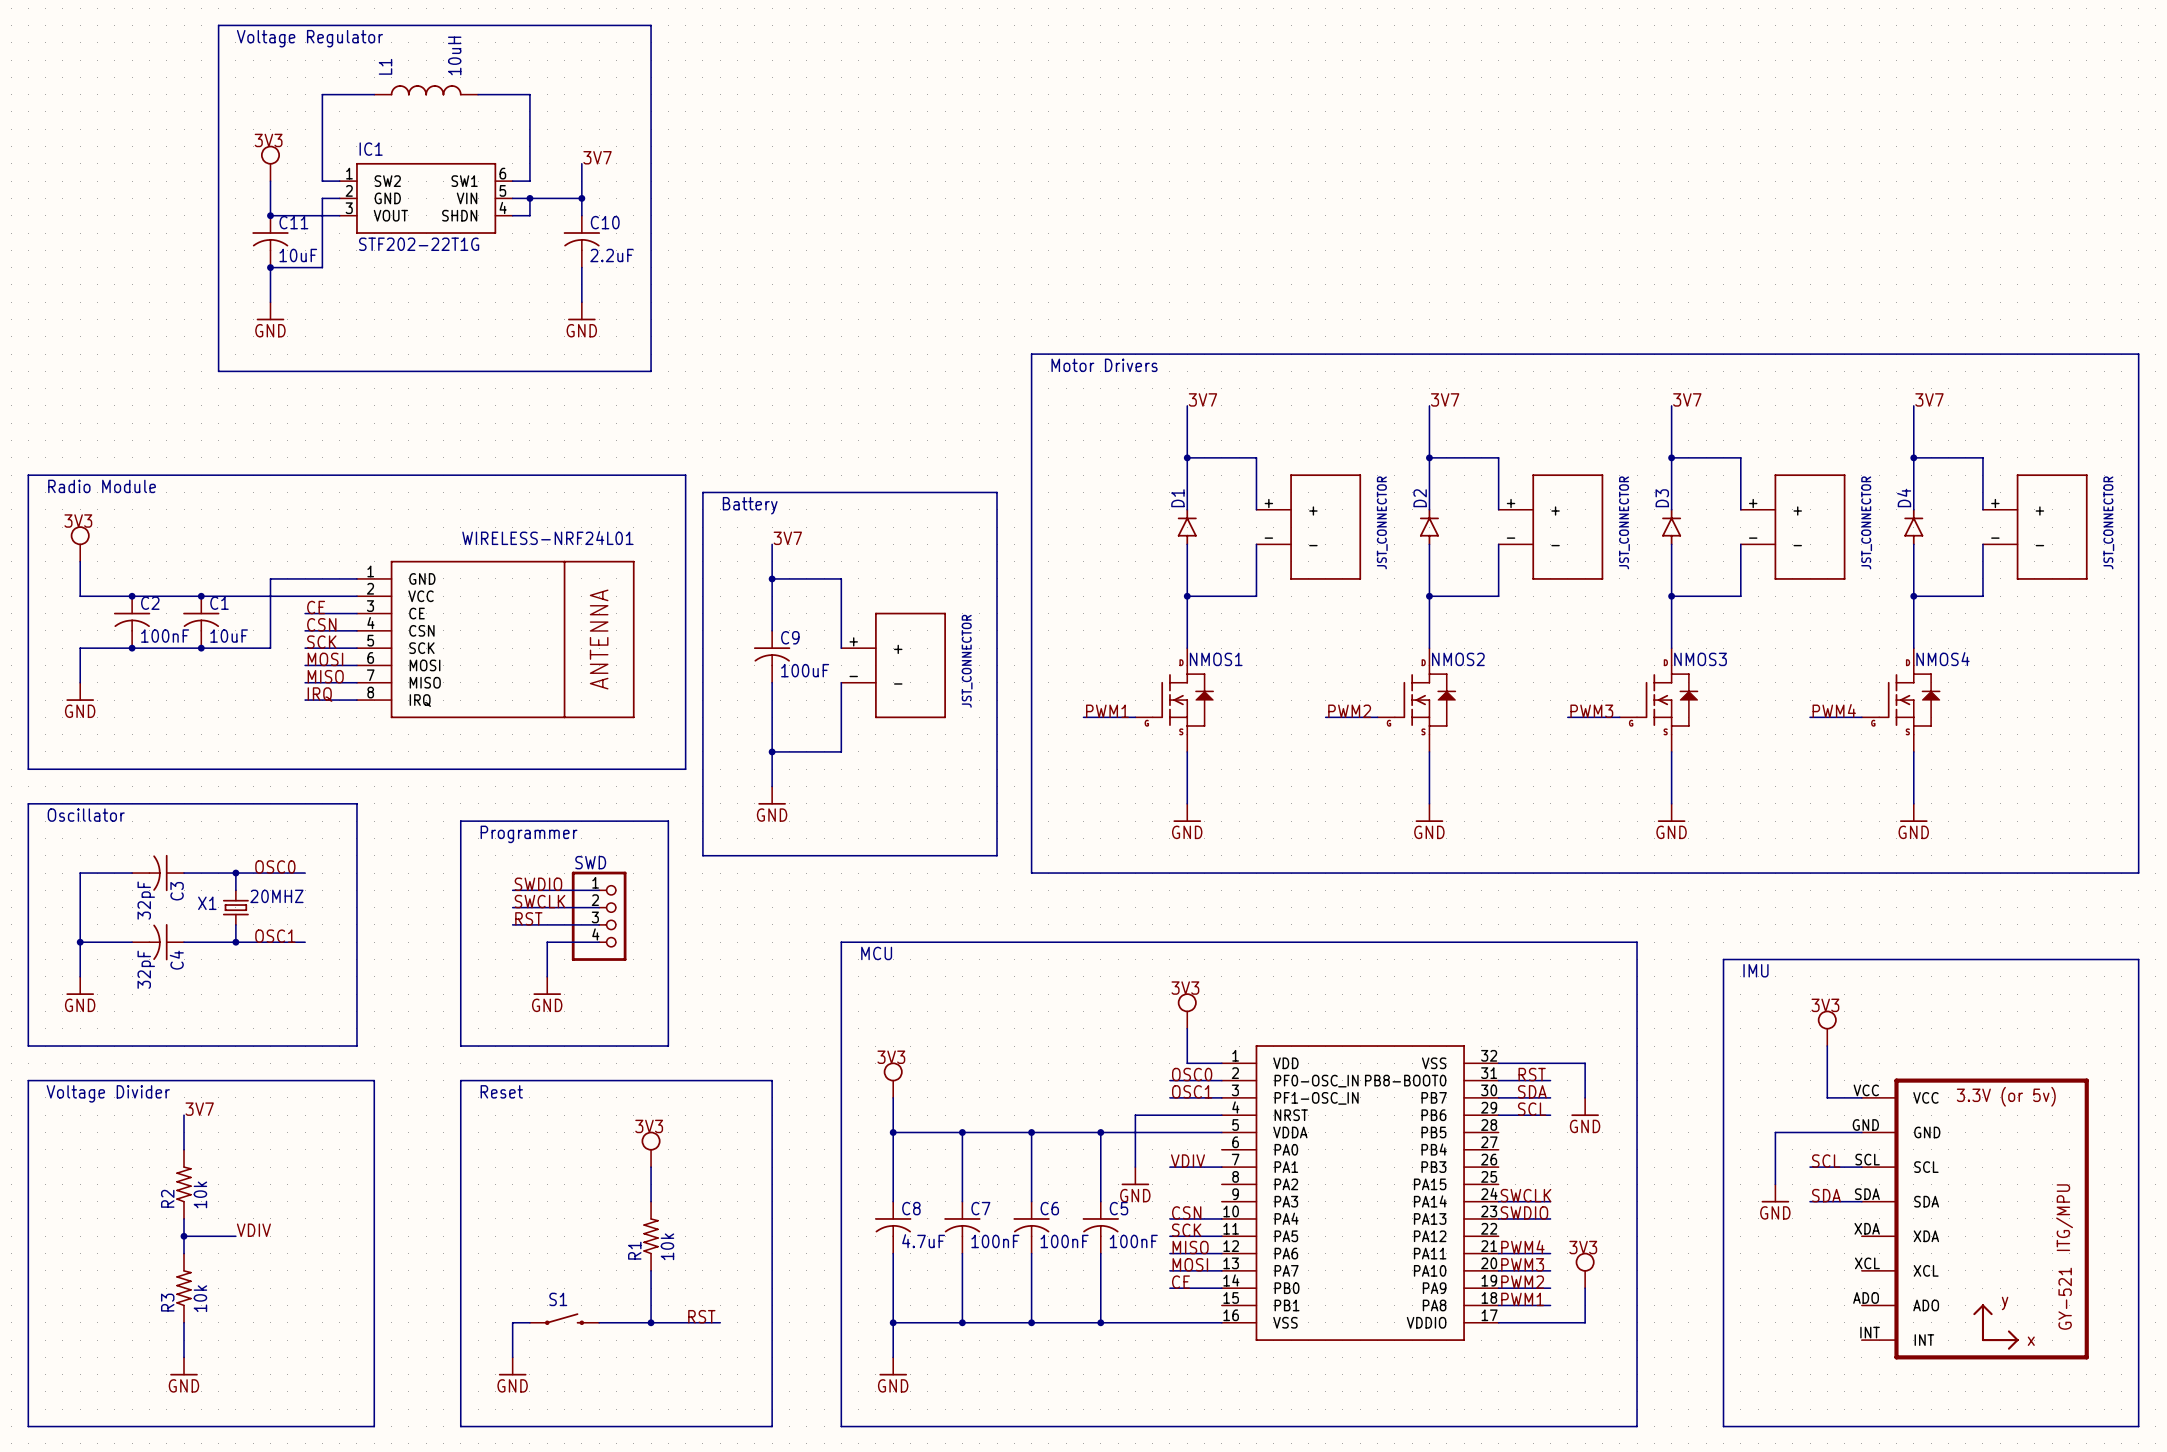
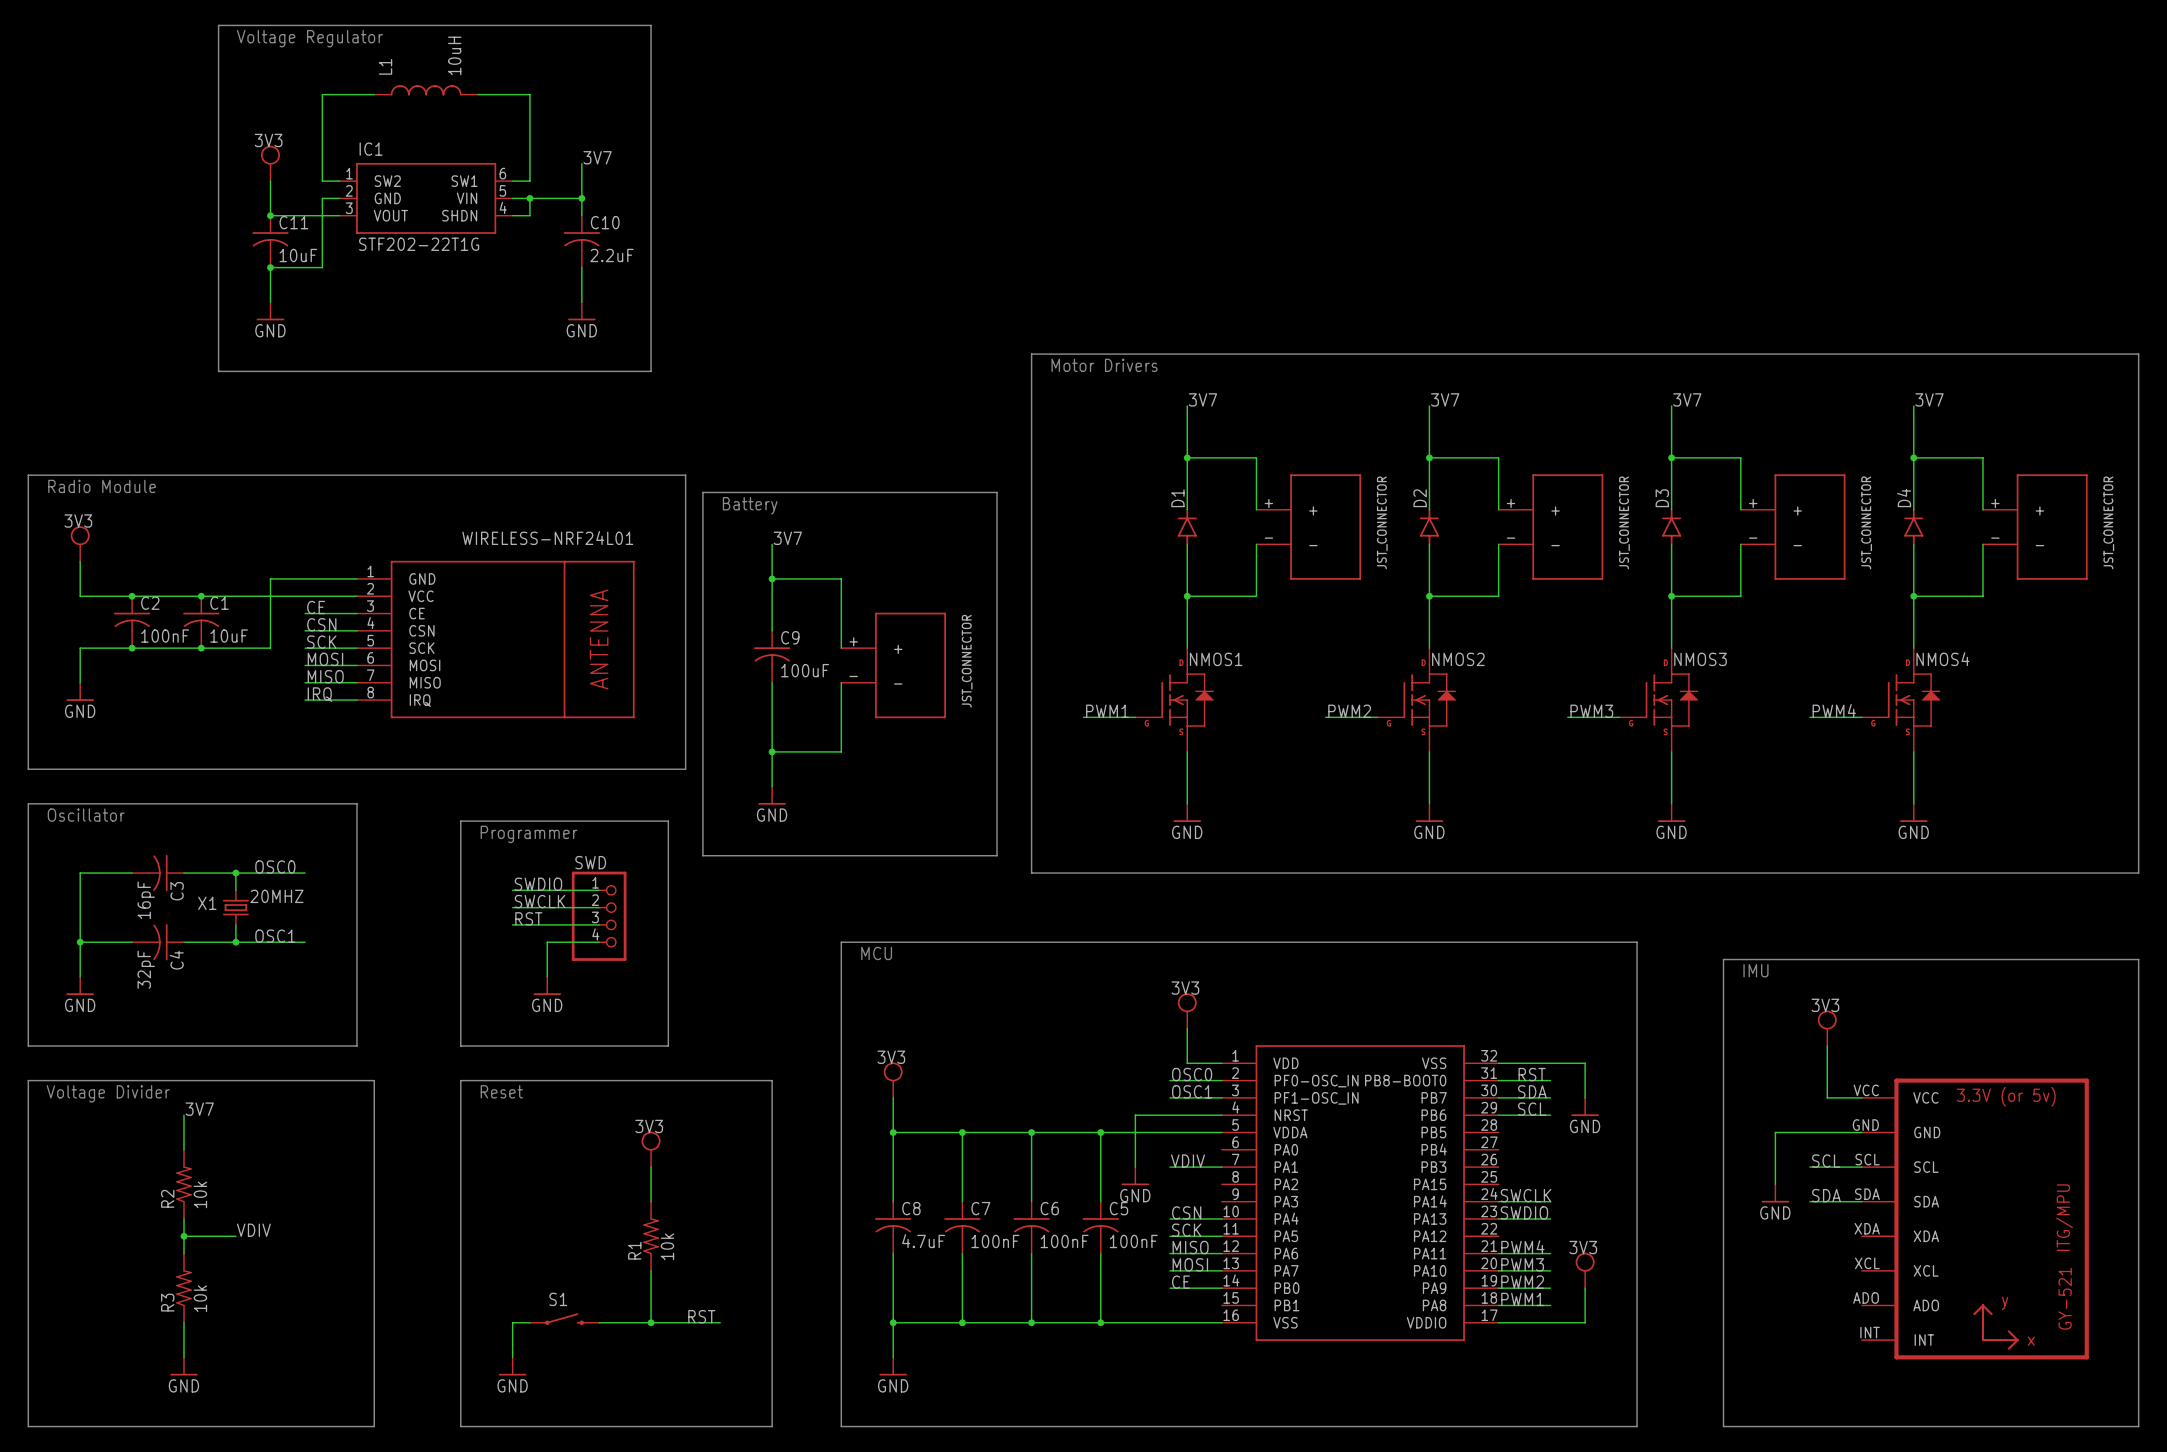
C3 value: 32pF (146, 900) -> 16pF (146, 900)

